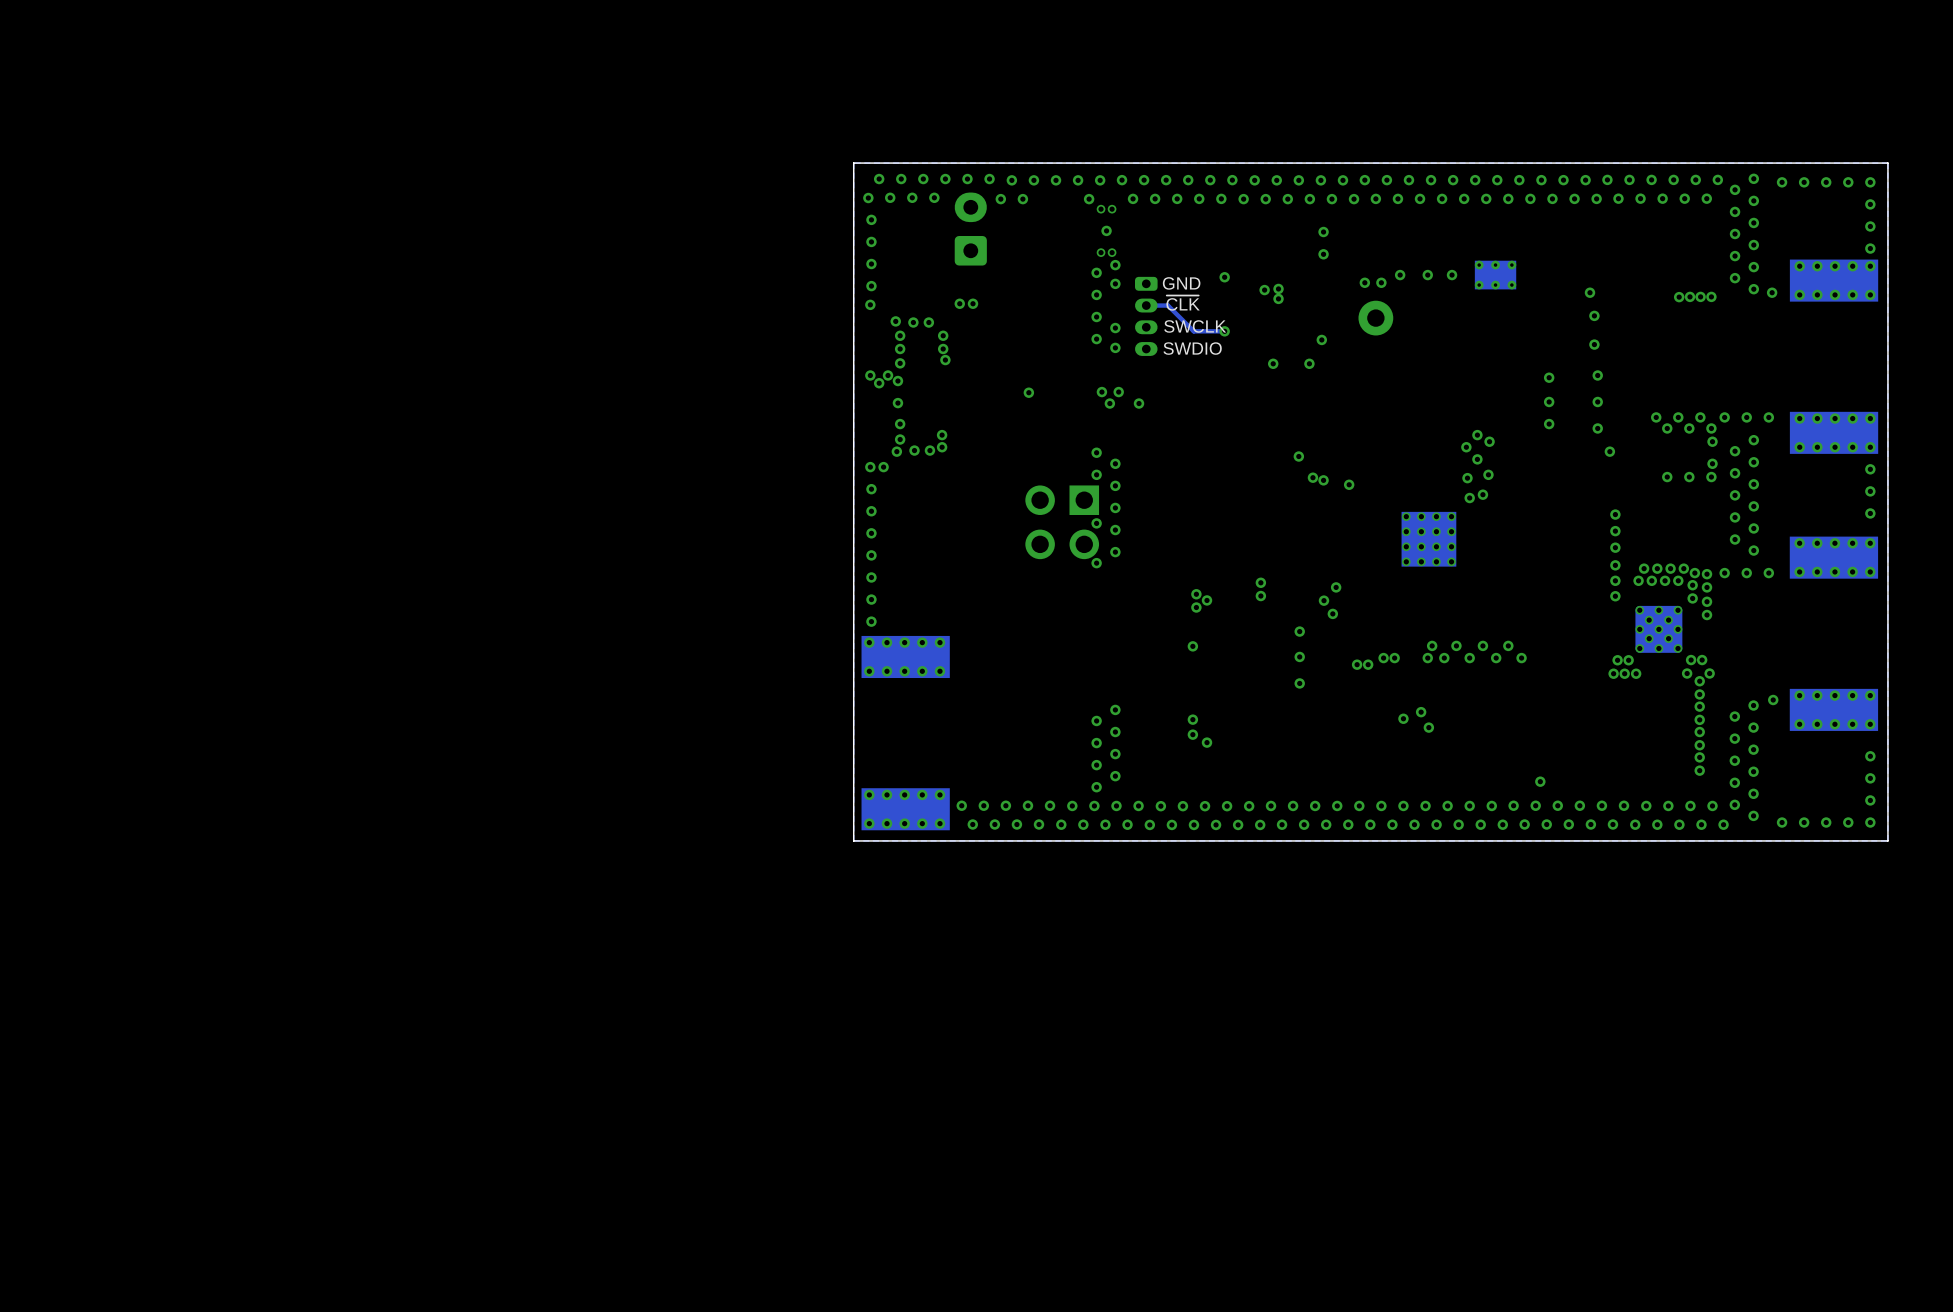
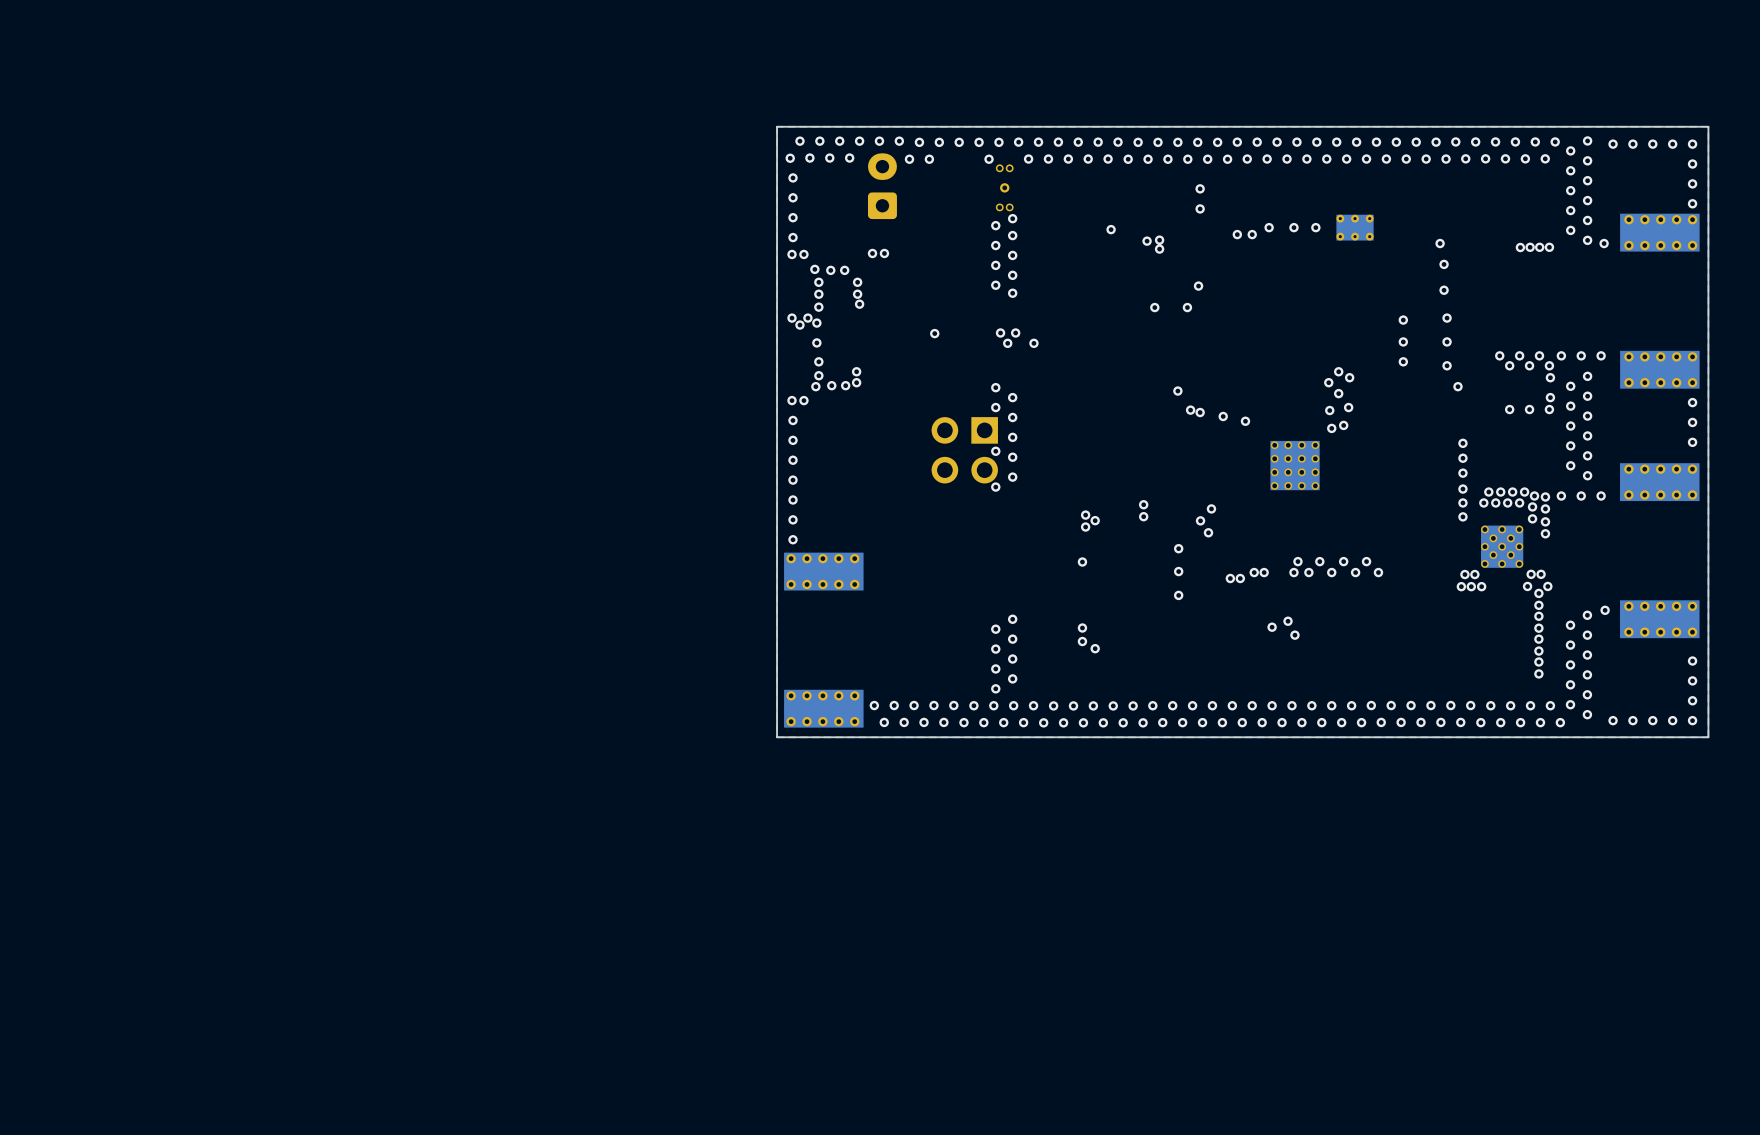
text: GND (1181, 283) -> none
text: ~{CLK} (1183, 303) -> none
via: none -> (803, 254)
via: none -> (1012, 255)
track: (1142, 305) (1167, 305) (1193, 331) (1224, 331) -> none
part: (1146, 316) -> none
part: (1375, 318) -> none
text: SWCLK (1195, 326) -> none
via: (1224, 331) -> none
text: SWDIO (1192, 348) -> none
via: none -> (1245, 421)
via: (1540, 781) -> none

